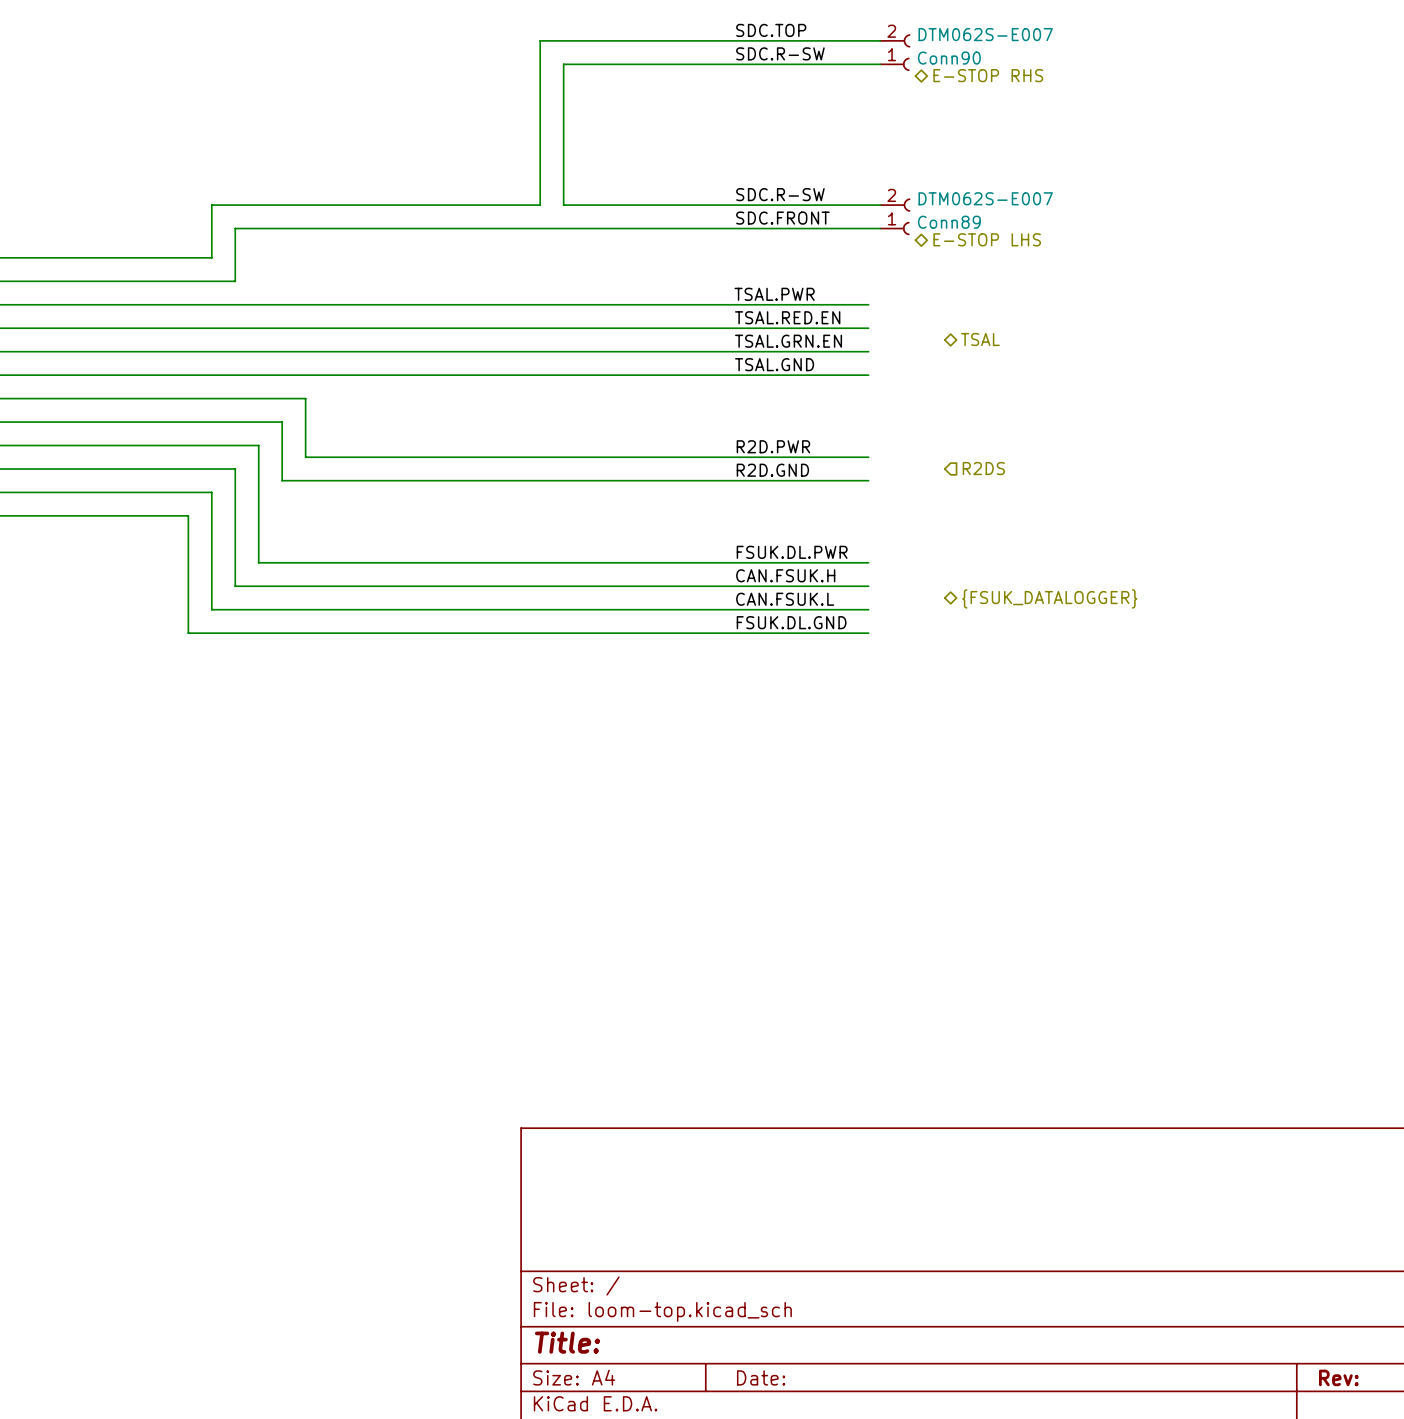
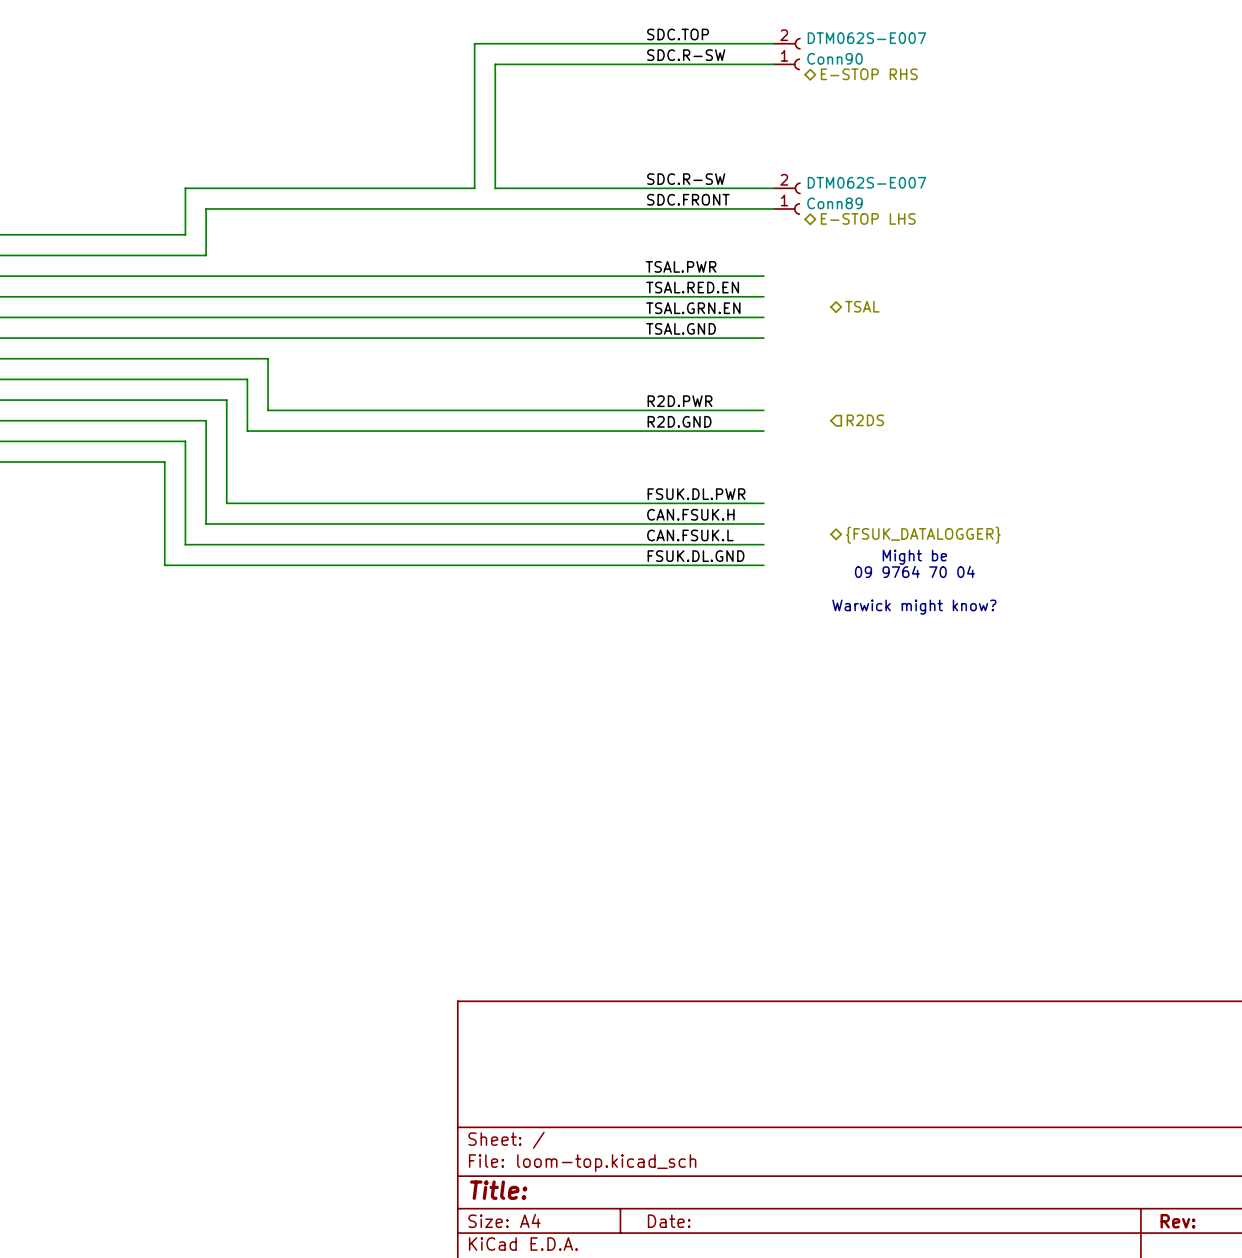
text: none -> Might be (914, 557)
text: none -> 09 9764 70 04 (914, 571)
text: none -> Warwick might know? (914, 607)

